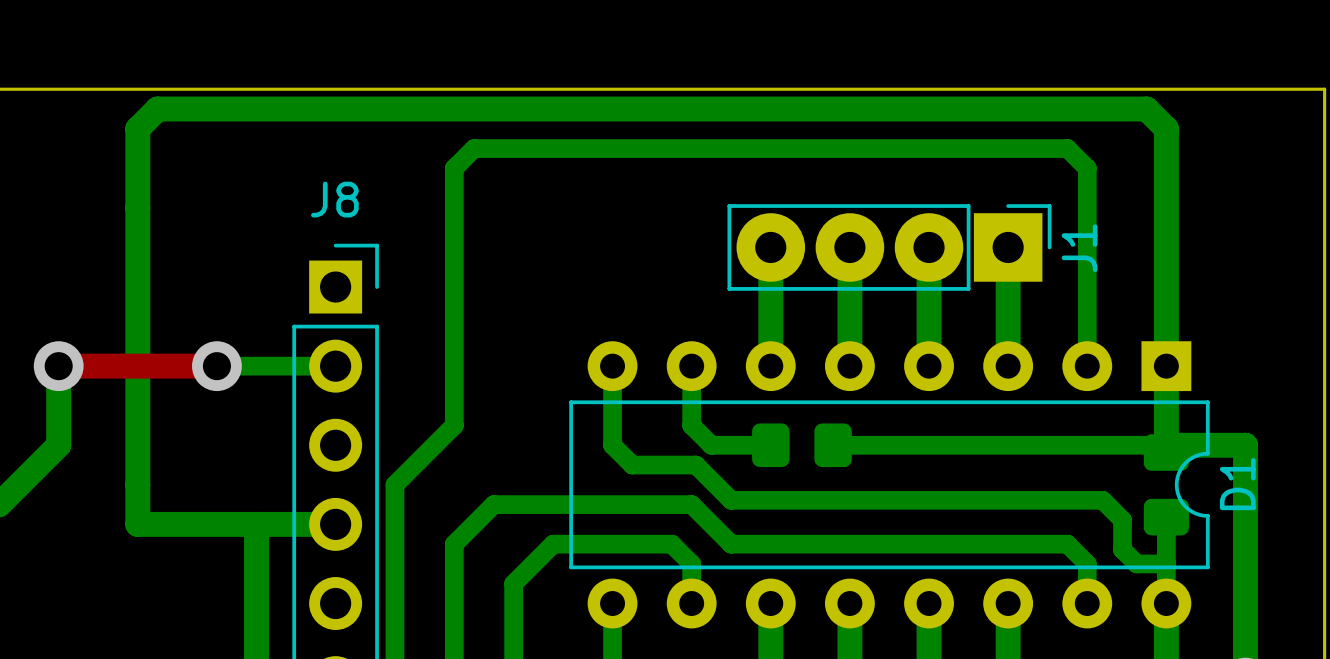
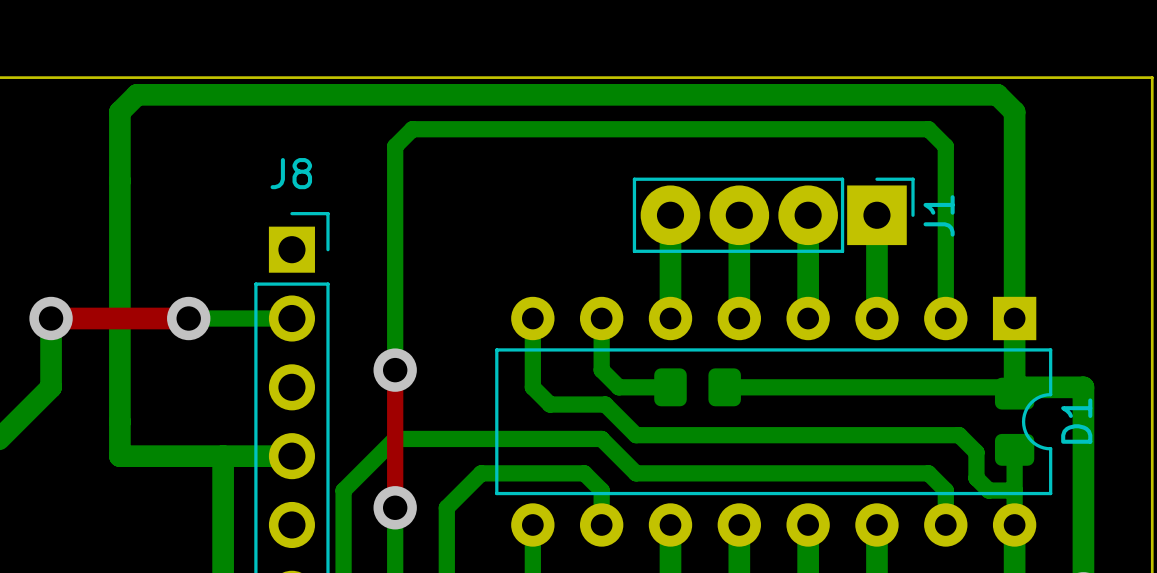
bottom track: (454, 425) (394, 484) (394, 563) -> none
top track: none -> (395, 370) (395, 507)
via: none -> (395, 370)
bottom track: (493, 504) (454, 544) (454, 583) -> (429, 438) (395, 438) (343, 490)
via: none -> (395, 507)

